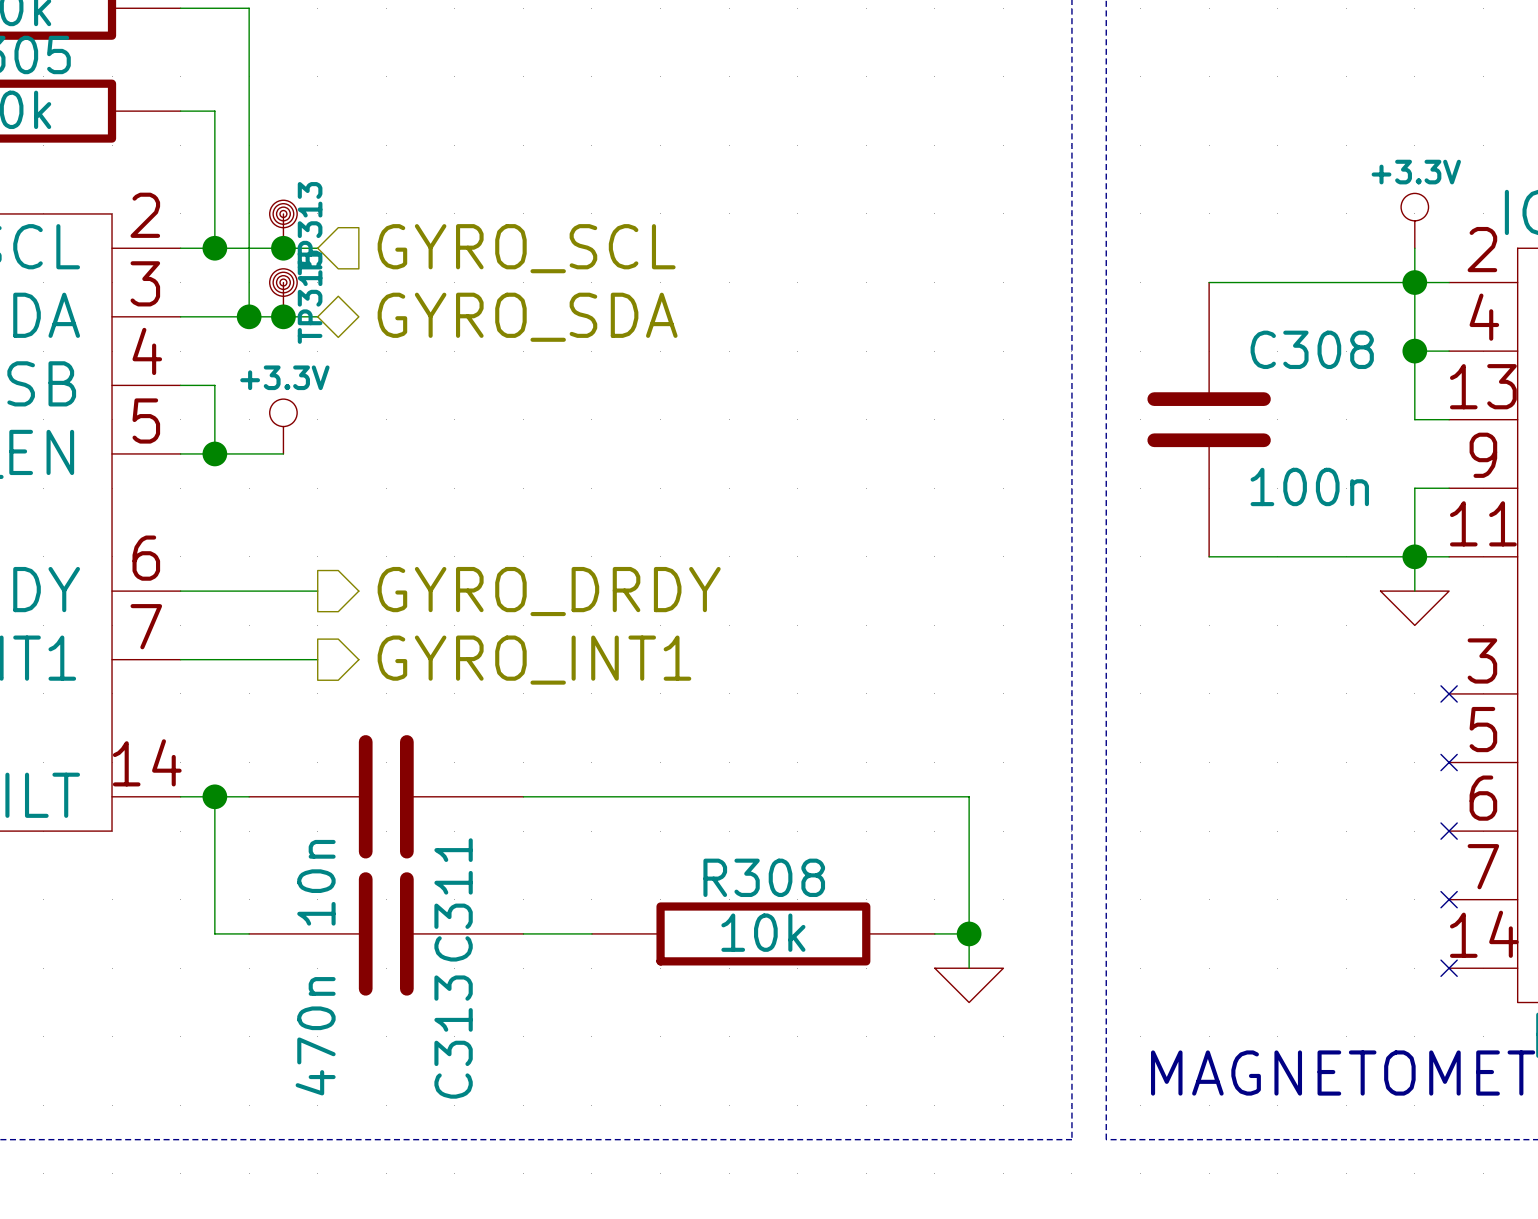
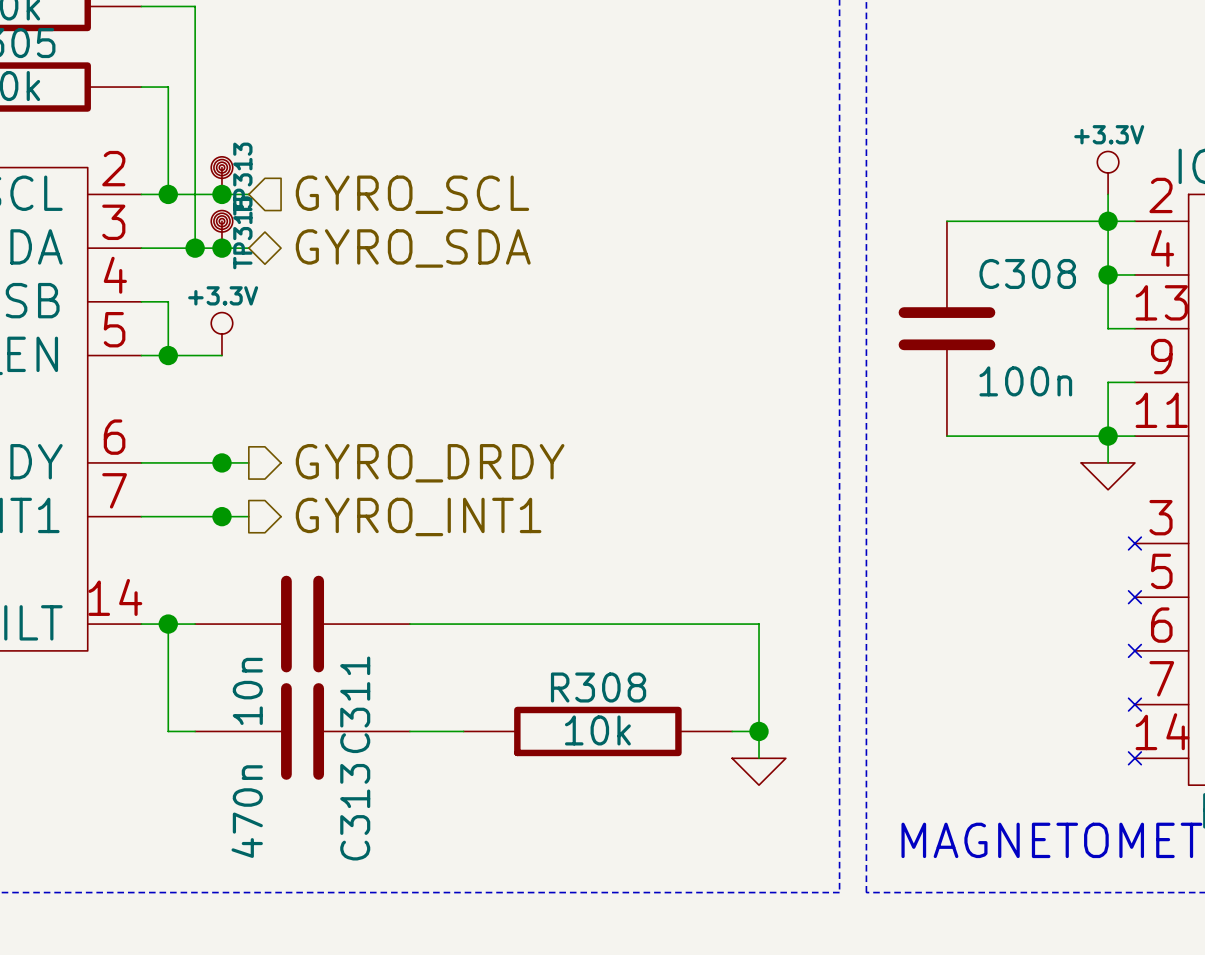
junction: none -> (221, 462)
junction: none -> (221, 516)

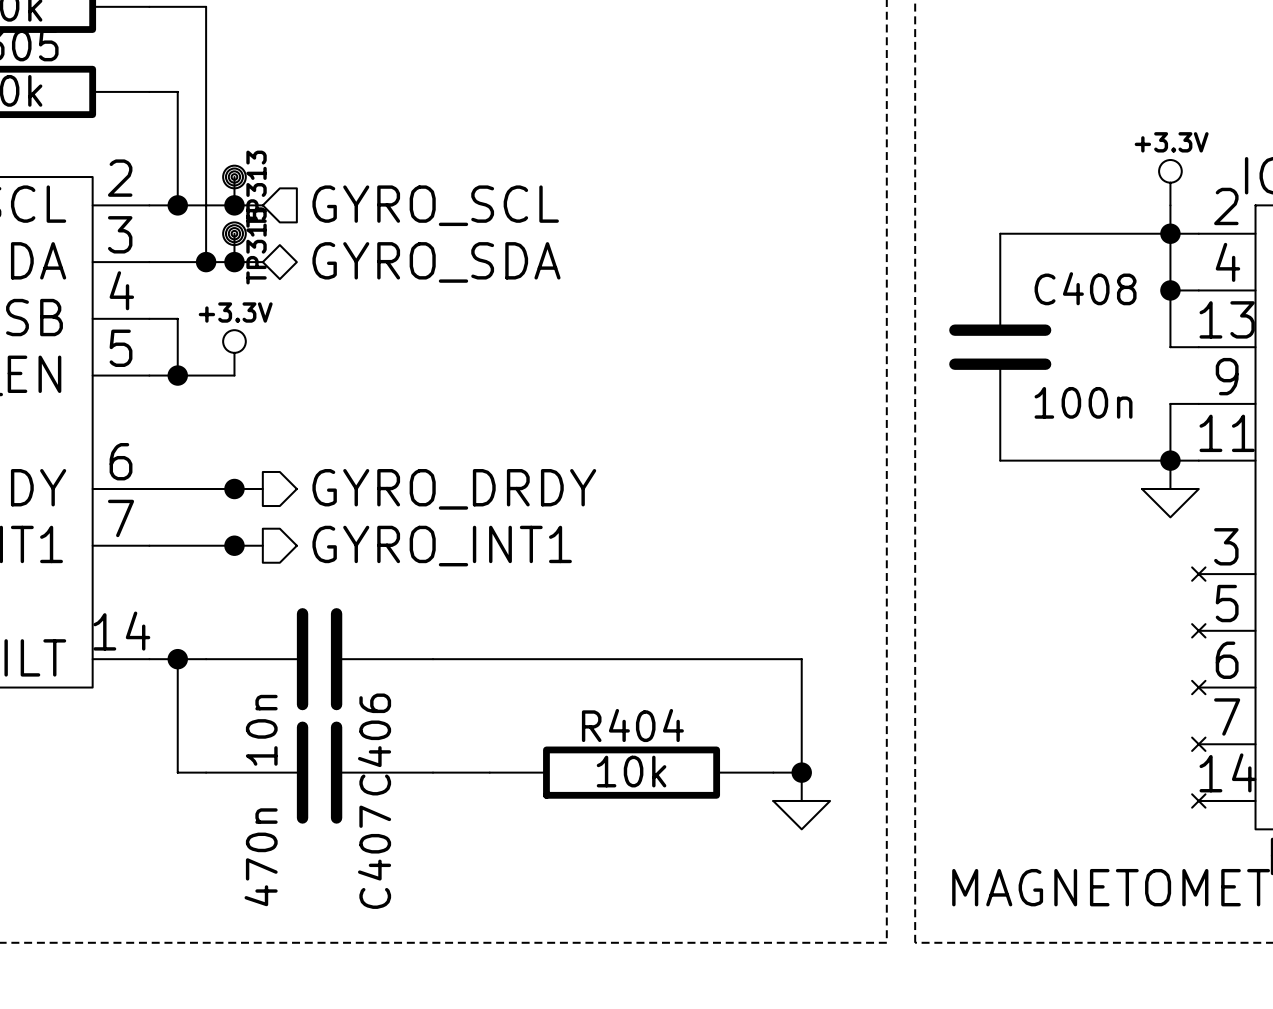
C308 name: C308 (1027, 273) -> C408 (1085, 288)
R308 name: R308 (598, 687) -> R404 (632, 725)
C311 name: C311 (355, 704) -> C406 (374, 744)
C313 name: C313 (355, 812) -> C407 (374, 857)

